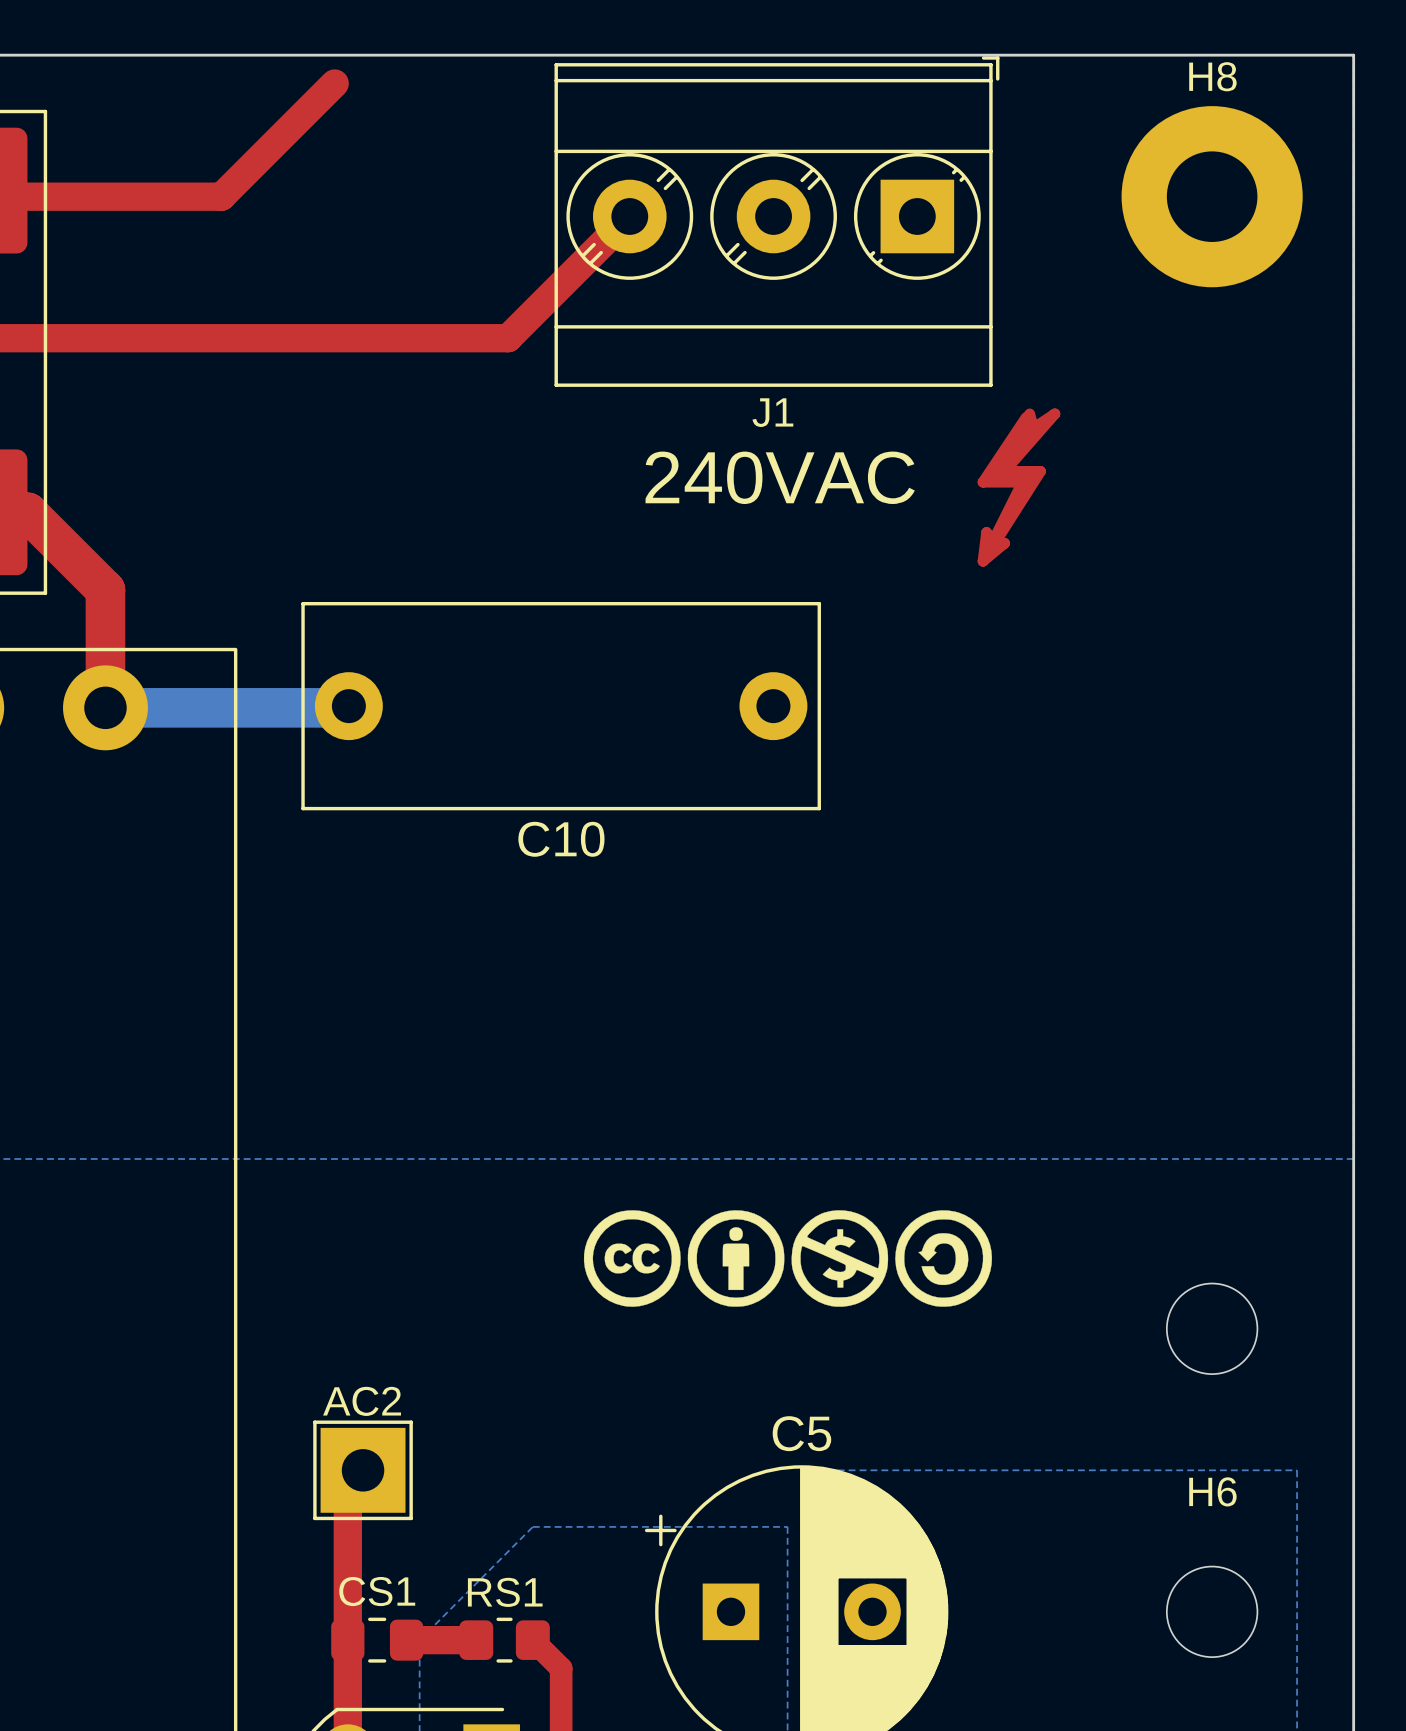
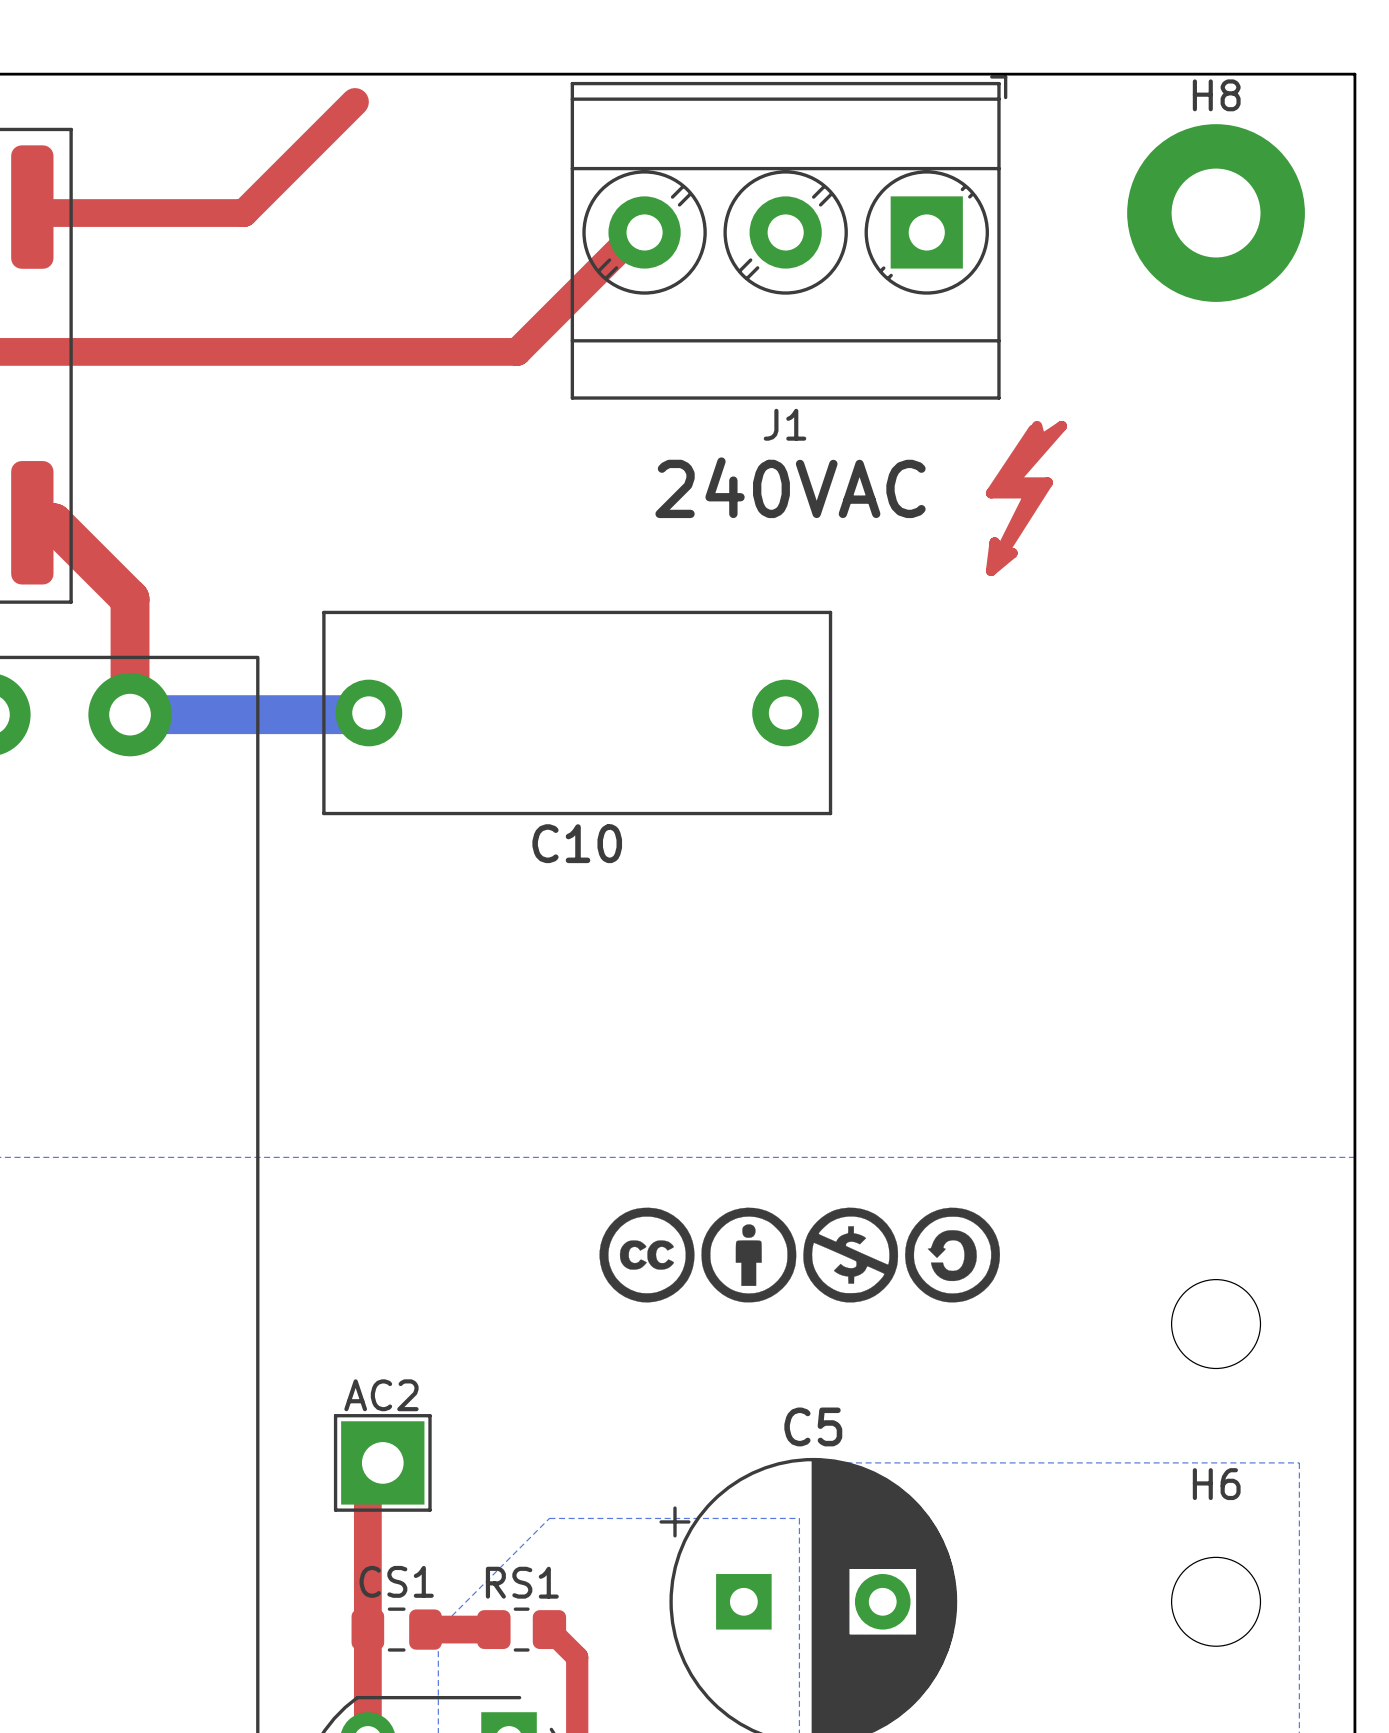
top track: (629, 216) (508, 338) (500, 338) -> (628, 240) (517, 351)

